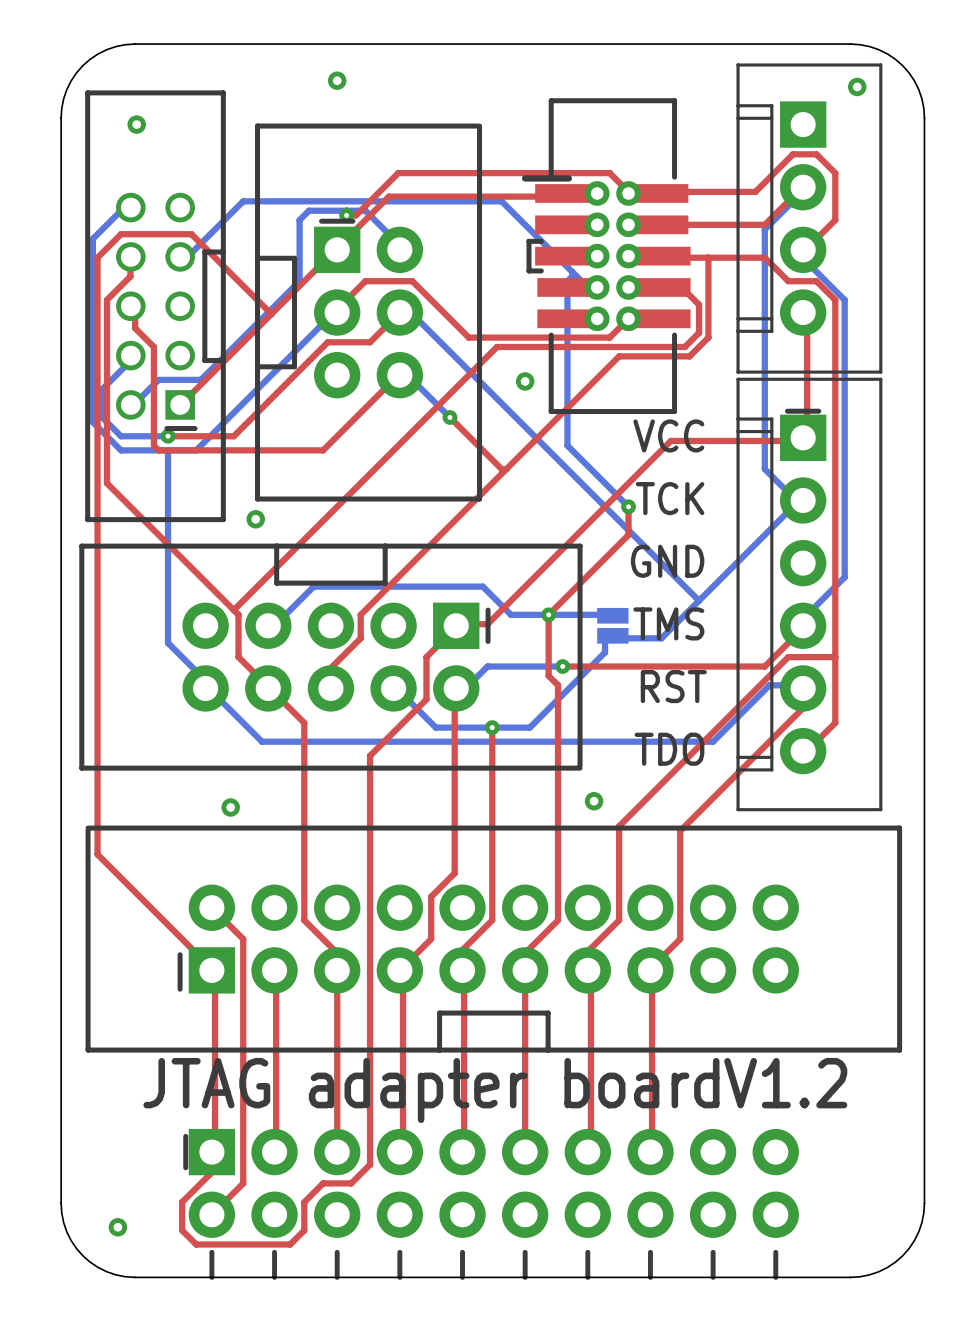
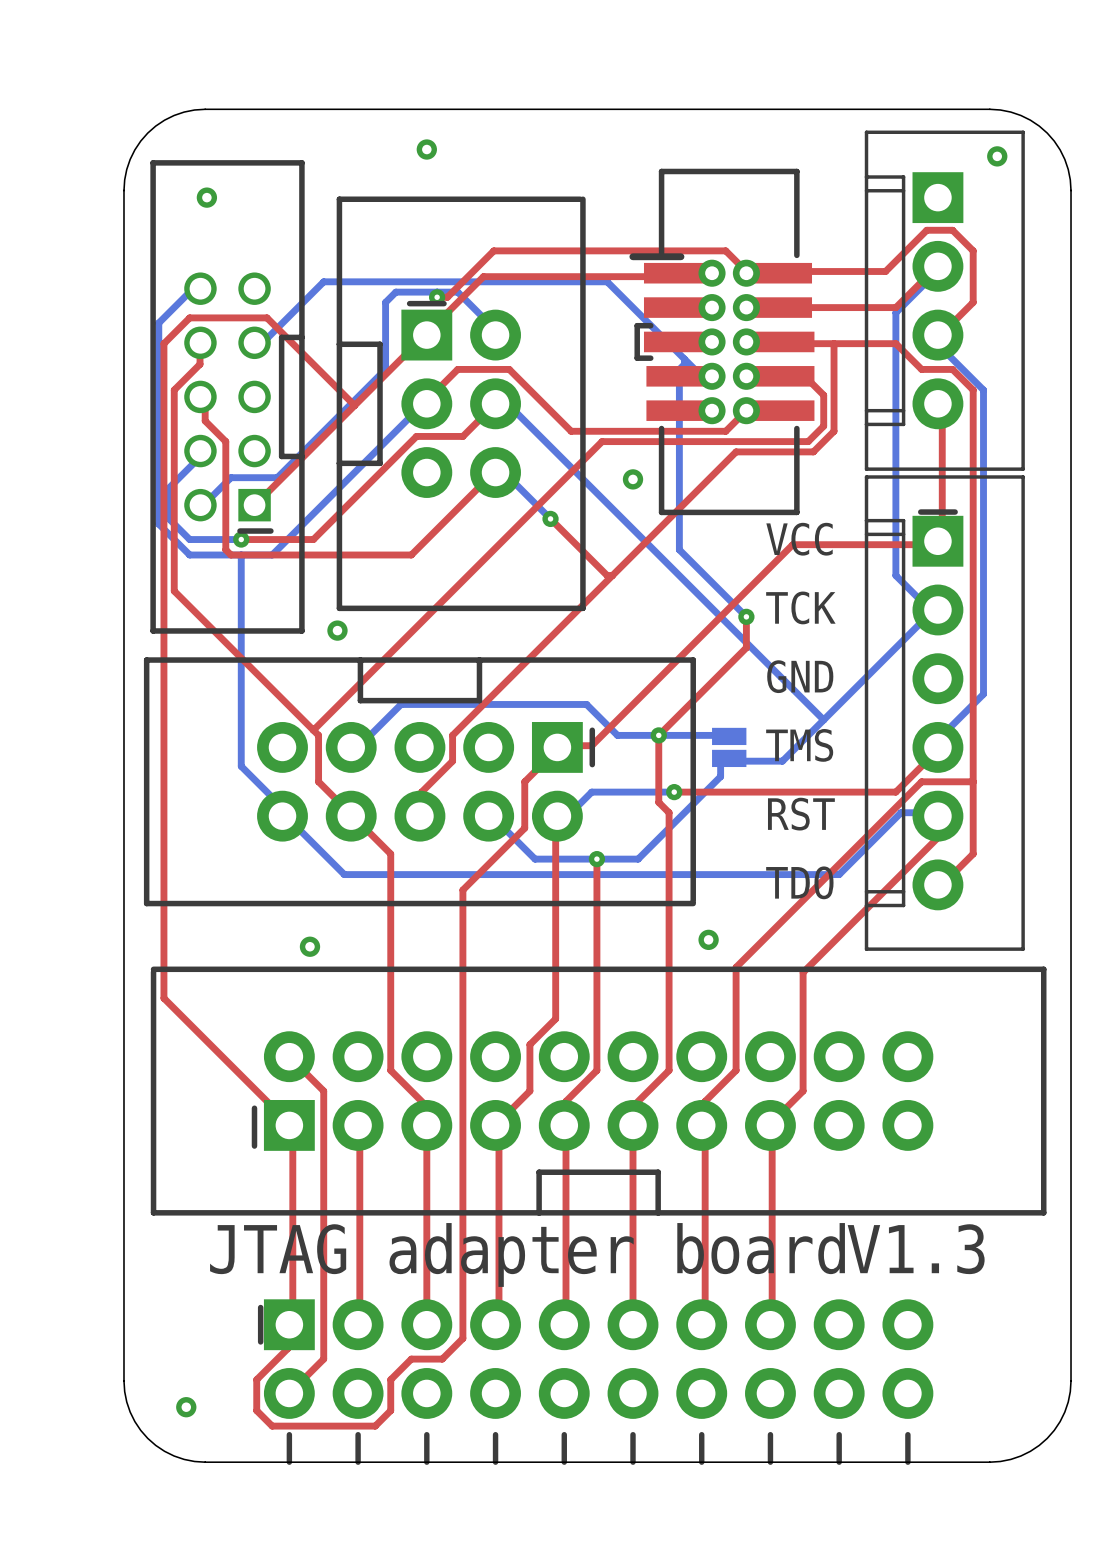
text: V1.2 (785, 1083) -> V1.3 (916, 1249)

